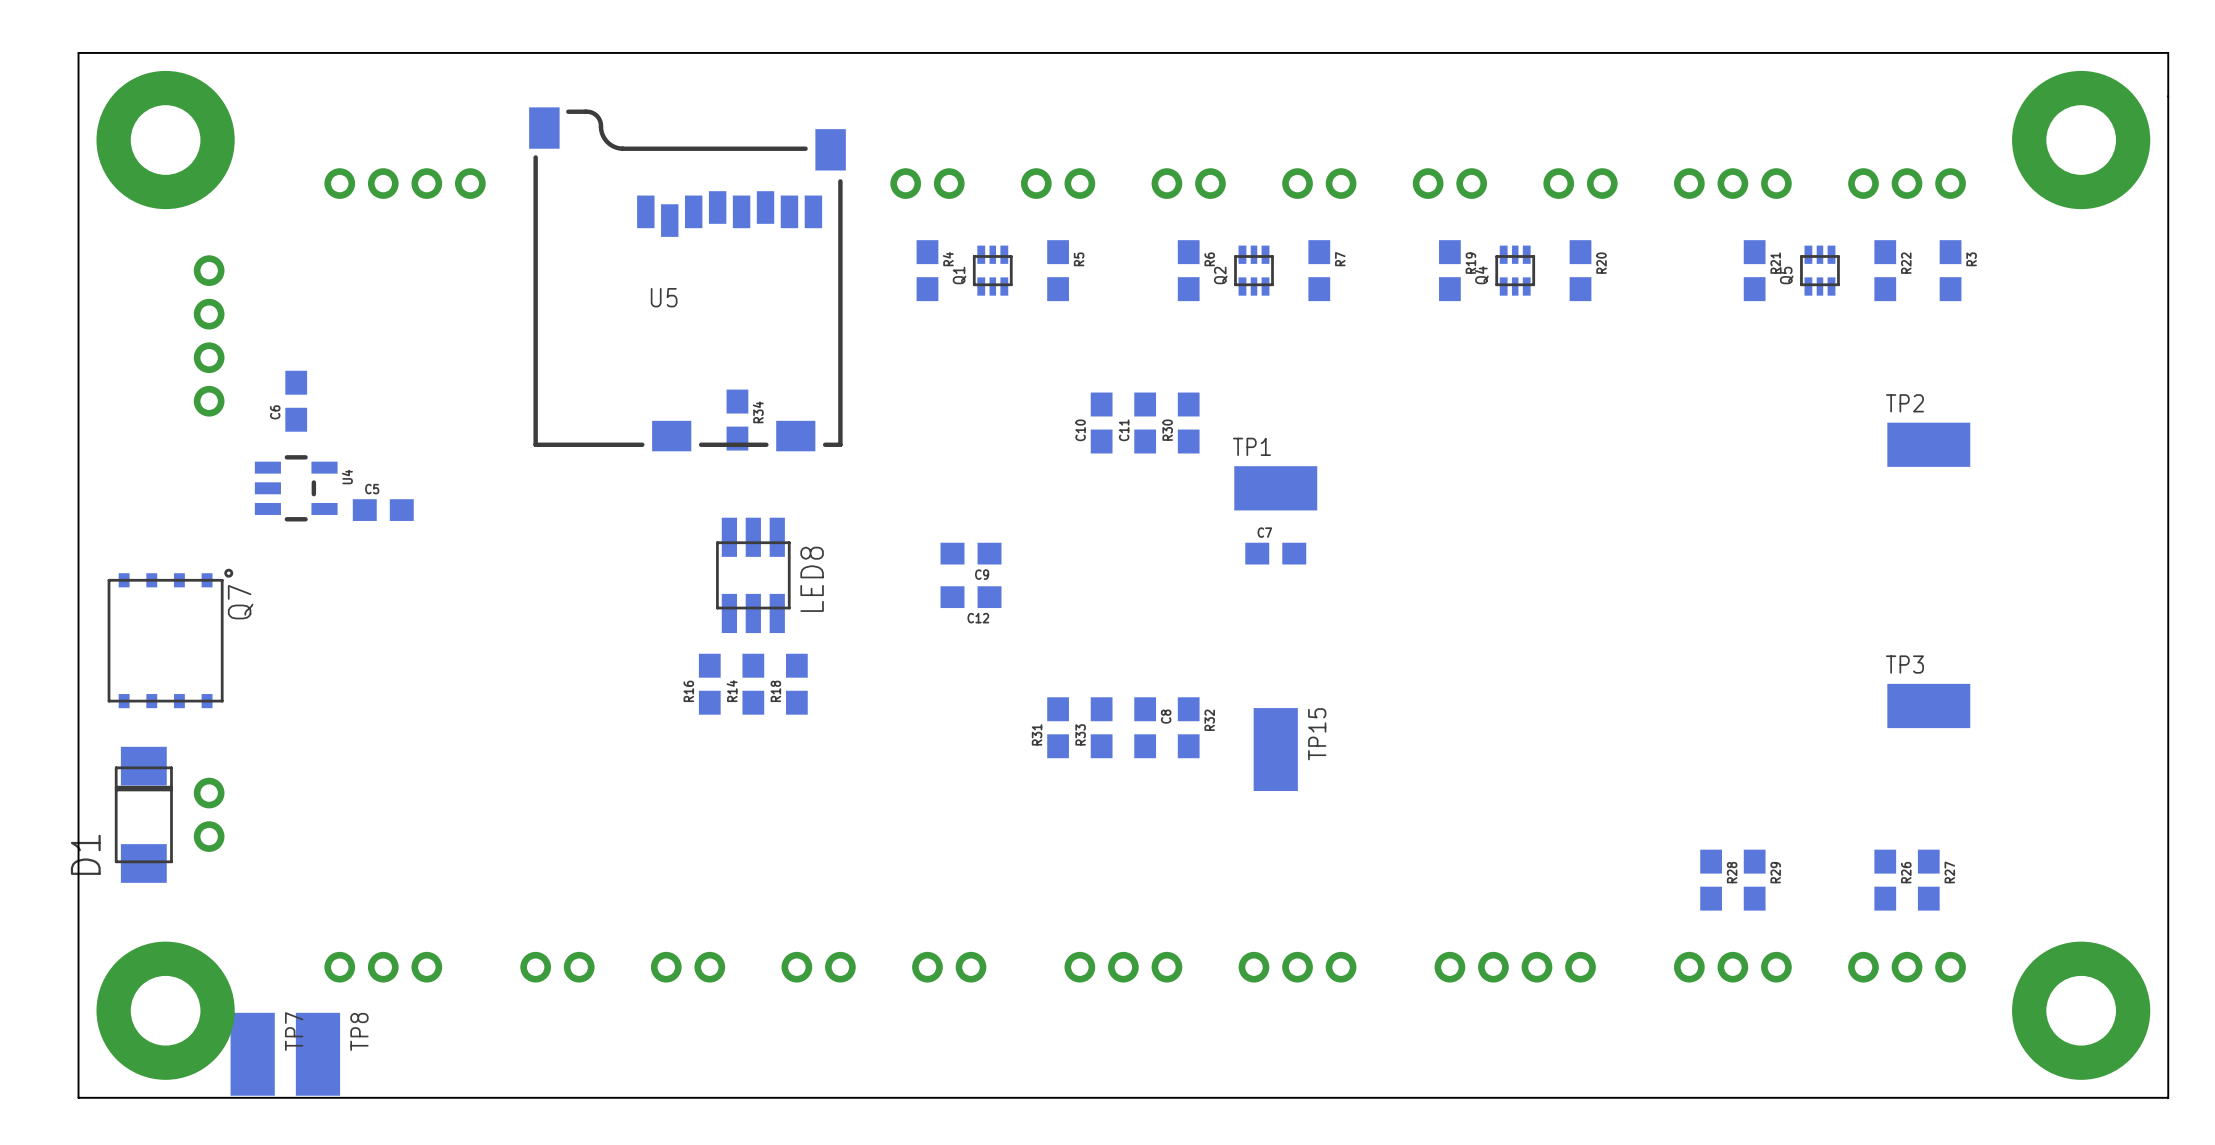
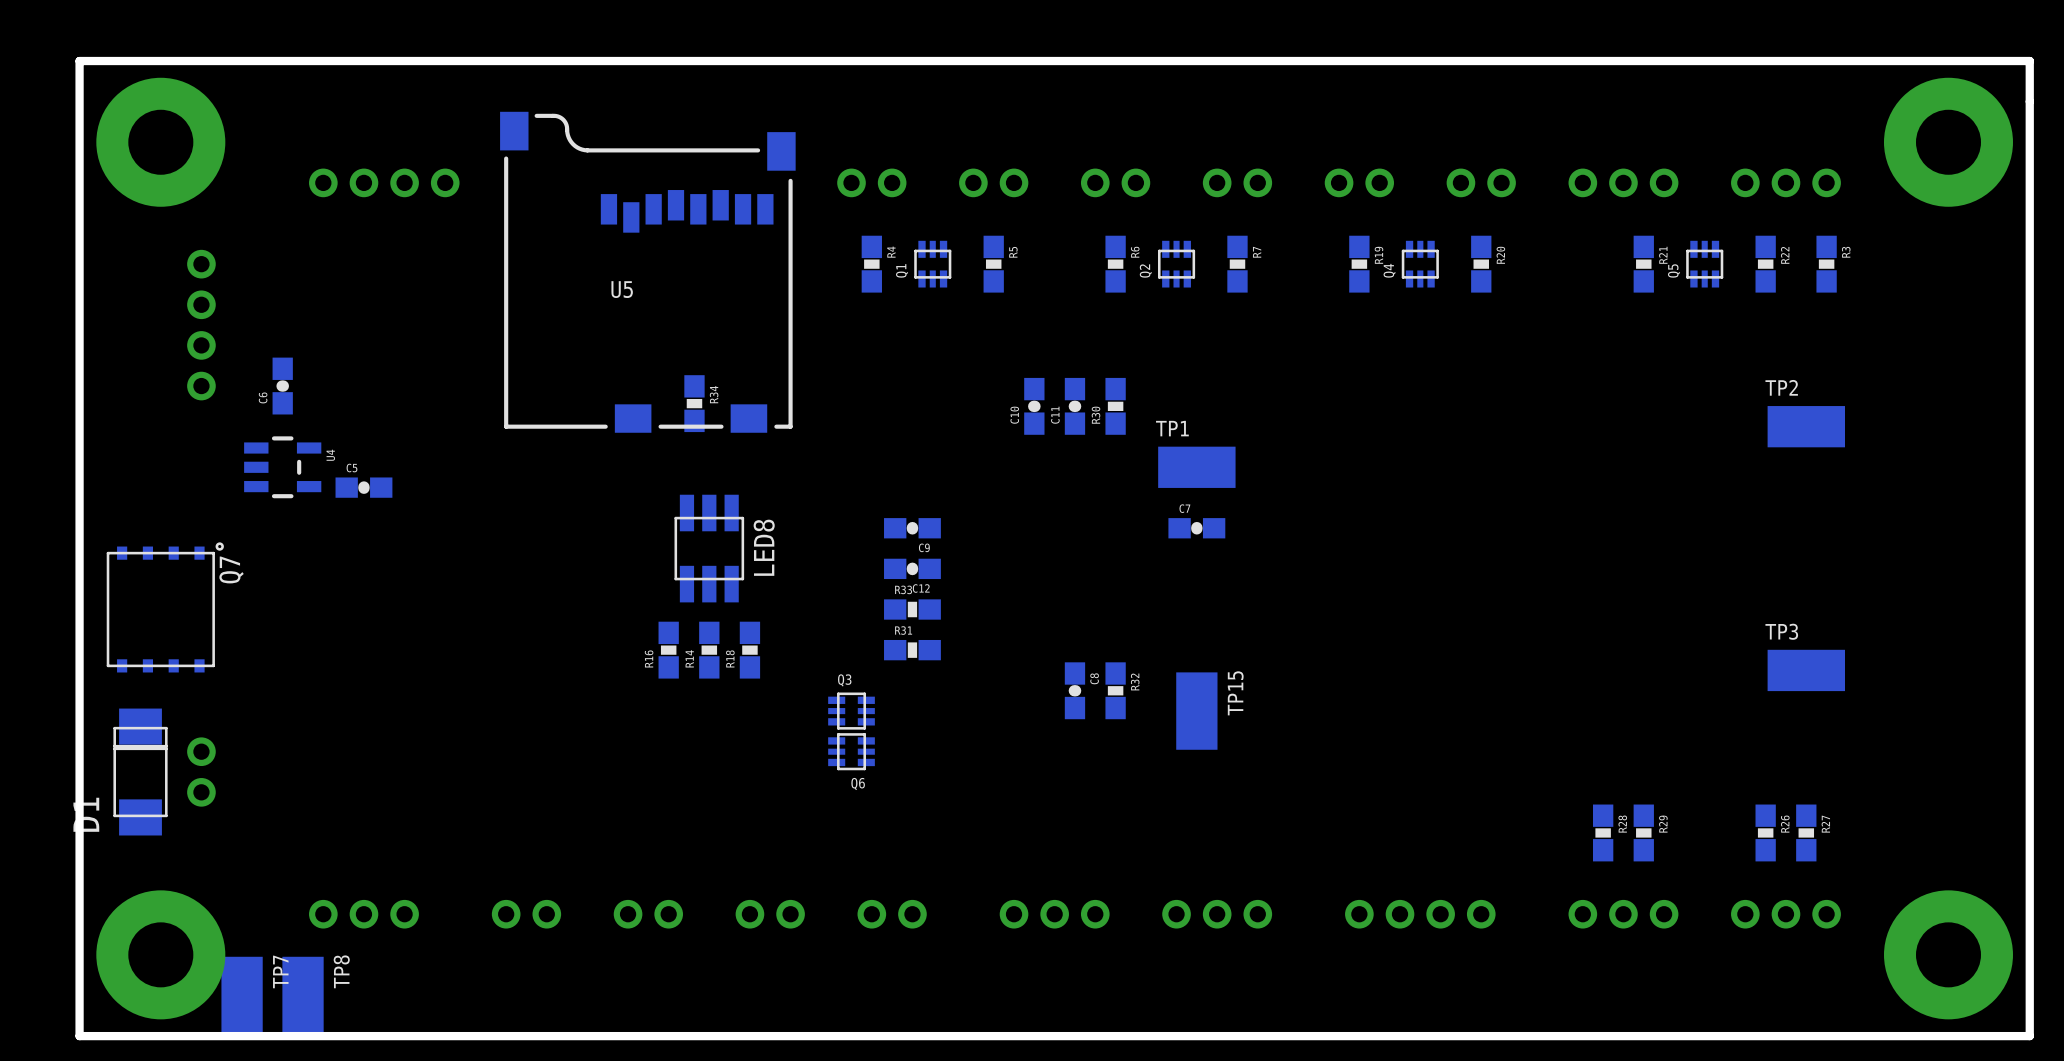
board edge width: thin (2168, 52) (2168, 1097) (78, 1097) (78, 52) (2168, 52) -> thick (2029, 61) (2029, 1036) (79, 1036) (79, 61) (2029, 61)
R4 footprint: [916, 240, 939, 302] -> [861, 235, 882, 293]
R5 footprint: [1047, 240, 1069, 302] -> [983, 235, 1004, 293]
R6 footprint: [1177, 240, 1200, 302] -> [1105, 235, 1126, 293]
R7 footprint: [1308, 240, 1331, 302] -> [1227, 235, 1248, 293]
R19 footprint: [1439, 240, 1461, 302] -> [1349, 235, 1370, 293]
R20 footprint: [1569, 240, 1592, 302] -> [1471, 235, 1492, 293]
R21 footprint: [1743, 240, 1766, 302] -> [1633, 235, 1654, 293]
R22 footprint: [1874, 240, 1897, 302] -> [1755, 235, 1776, 293]
R3 footprint: [1939, 240, 1962, 302] -> [1816, 235, 1837, 293]
C6 footprint: [285, 370, 308, 432] -> [272, 357, 293, 415]
R34 footprint: [726, 389, 749, 451] -> [684, 375, 705, 433]
C10 footprint: [1090, 392, 1113, 454] -> [1024, 377, 1045, 435]
C11 footprint: [1134, 392, 1157, 454] -> [1064, 377, 1086, 435]
R30 footprint: [1177, 392, 1200, 454] -> [1105, 377, 1126, 435]
C5 footprint: [352, 499, 414, 521] -> [335, 477, 393, 498]
C9 footprint: [940, 542, 1002, 565] -> [884, 518, 941, 539]
C7 footprint: [1245, 542, 1307, 565] -> [1168, 518, 1226, 539]
C12 footprint: [940, 586, 1002, 609] -> [884, 558, 941, 580]
R16 footprint: [698, 653, 721, 715] -> [658, 621, 679, 679]
R14 footprint: [742, 653, 765, 715] -> [699, 621, 720, 679]
R18 footprint: [785, 653, 808, 715] -> [739, 621, 761, 679]
R31 footprint: [1047, 697, 1069, 759] -> [884, 639, 941, 661]
R33 footprint: [1090, 697, 1113, 759] -> [884, 599, 941, 620]
C8 footprint: [1134, 697, 1157, 759] -> [1064, 662, 1086, 720]
R32 footprint: [1177, 697, 1200, 759] -> [1105, 662, 1126, 720]
Q3: none -> (851, 711)
Q6: none -> (851, 751)
R28 footprint: [1700, 849, 1723, 911] -> [1592, 804, 1614, 862]
R29 footprint: [1743, 849, 1766, 911] -> [1633, 804, 1654, 862]
R26 footprint: [1874, 849, 1897, 911] -> [1755, 804, 1776, 862]
R27 footprint: [1917, 849, 1940, 911] -> [1796, 804, 1817, 862]

